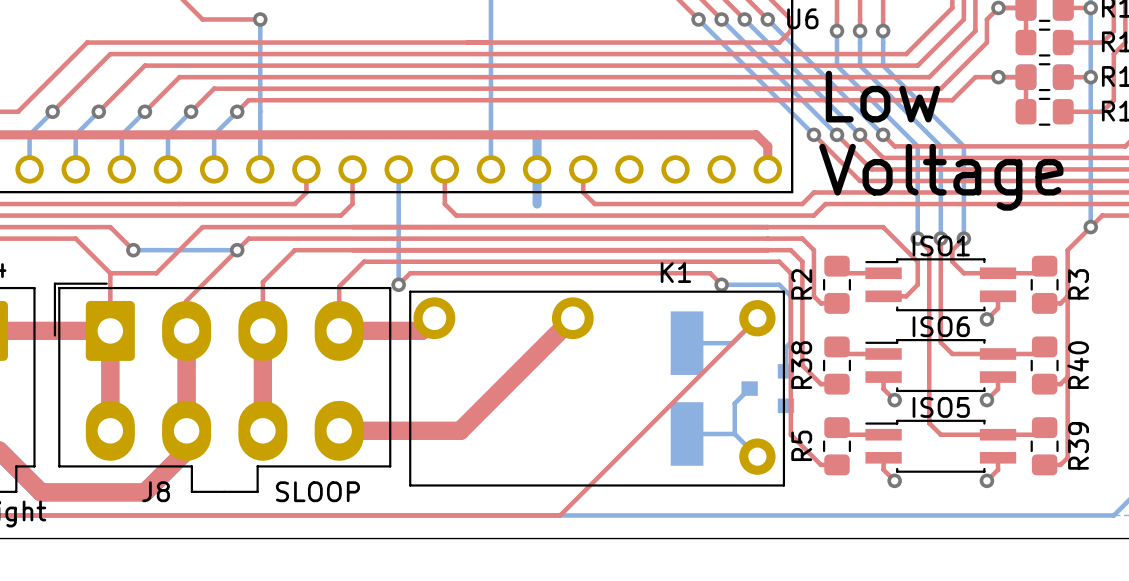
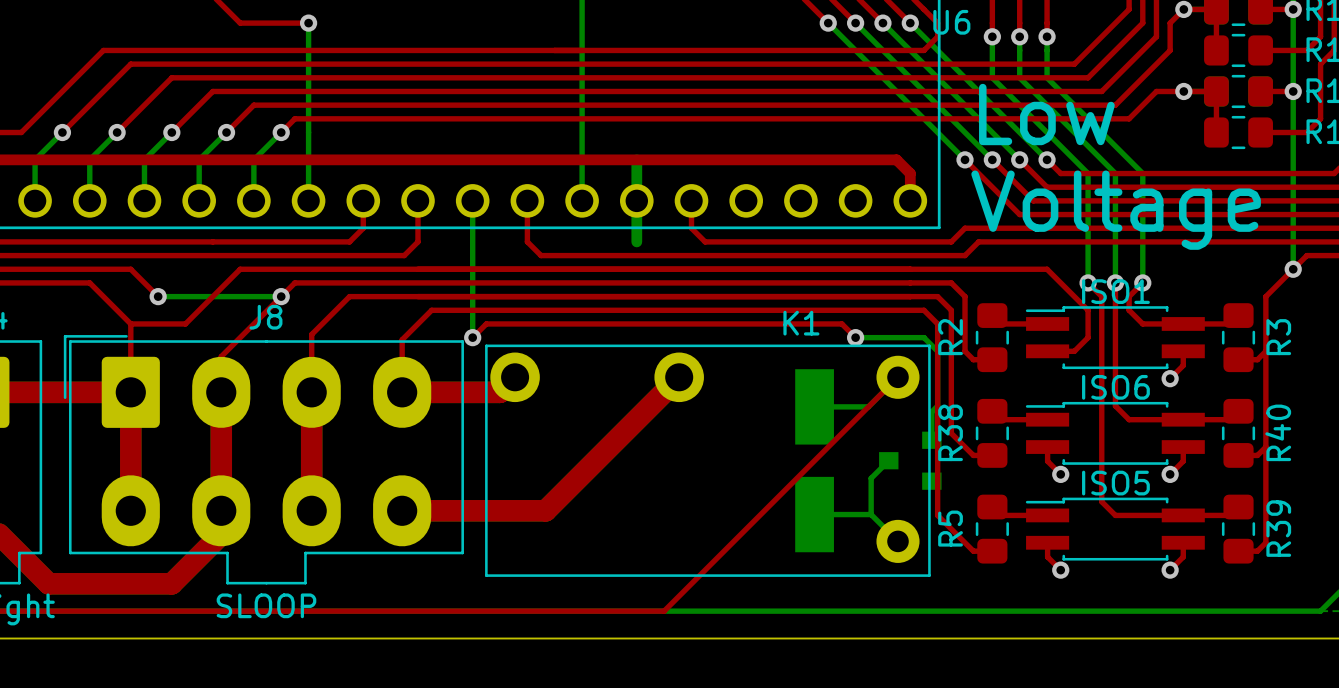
J8 name position: J8 (156, 491) -> J8 (265, 317)
J8 value position: SLOOP (317, 491) -> SLOOP (266, 605)

